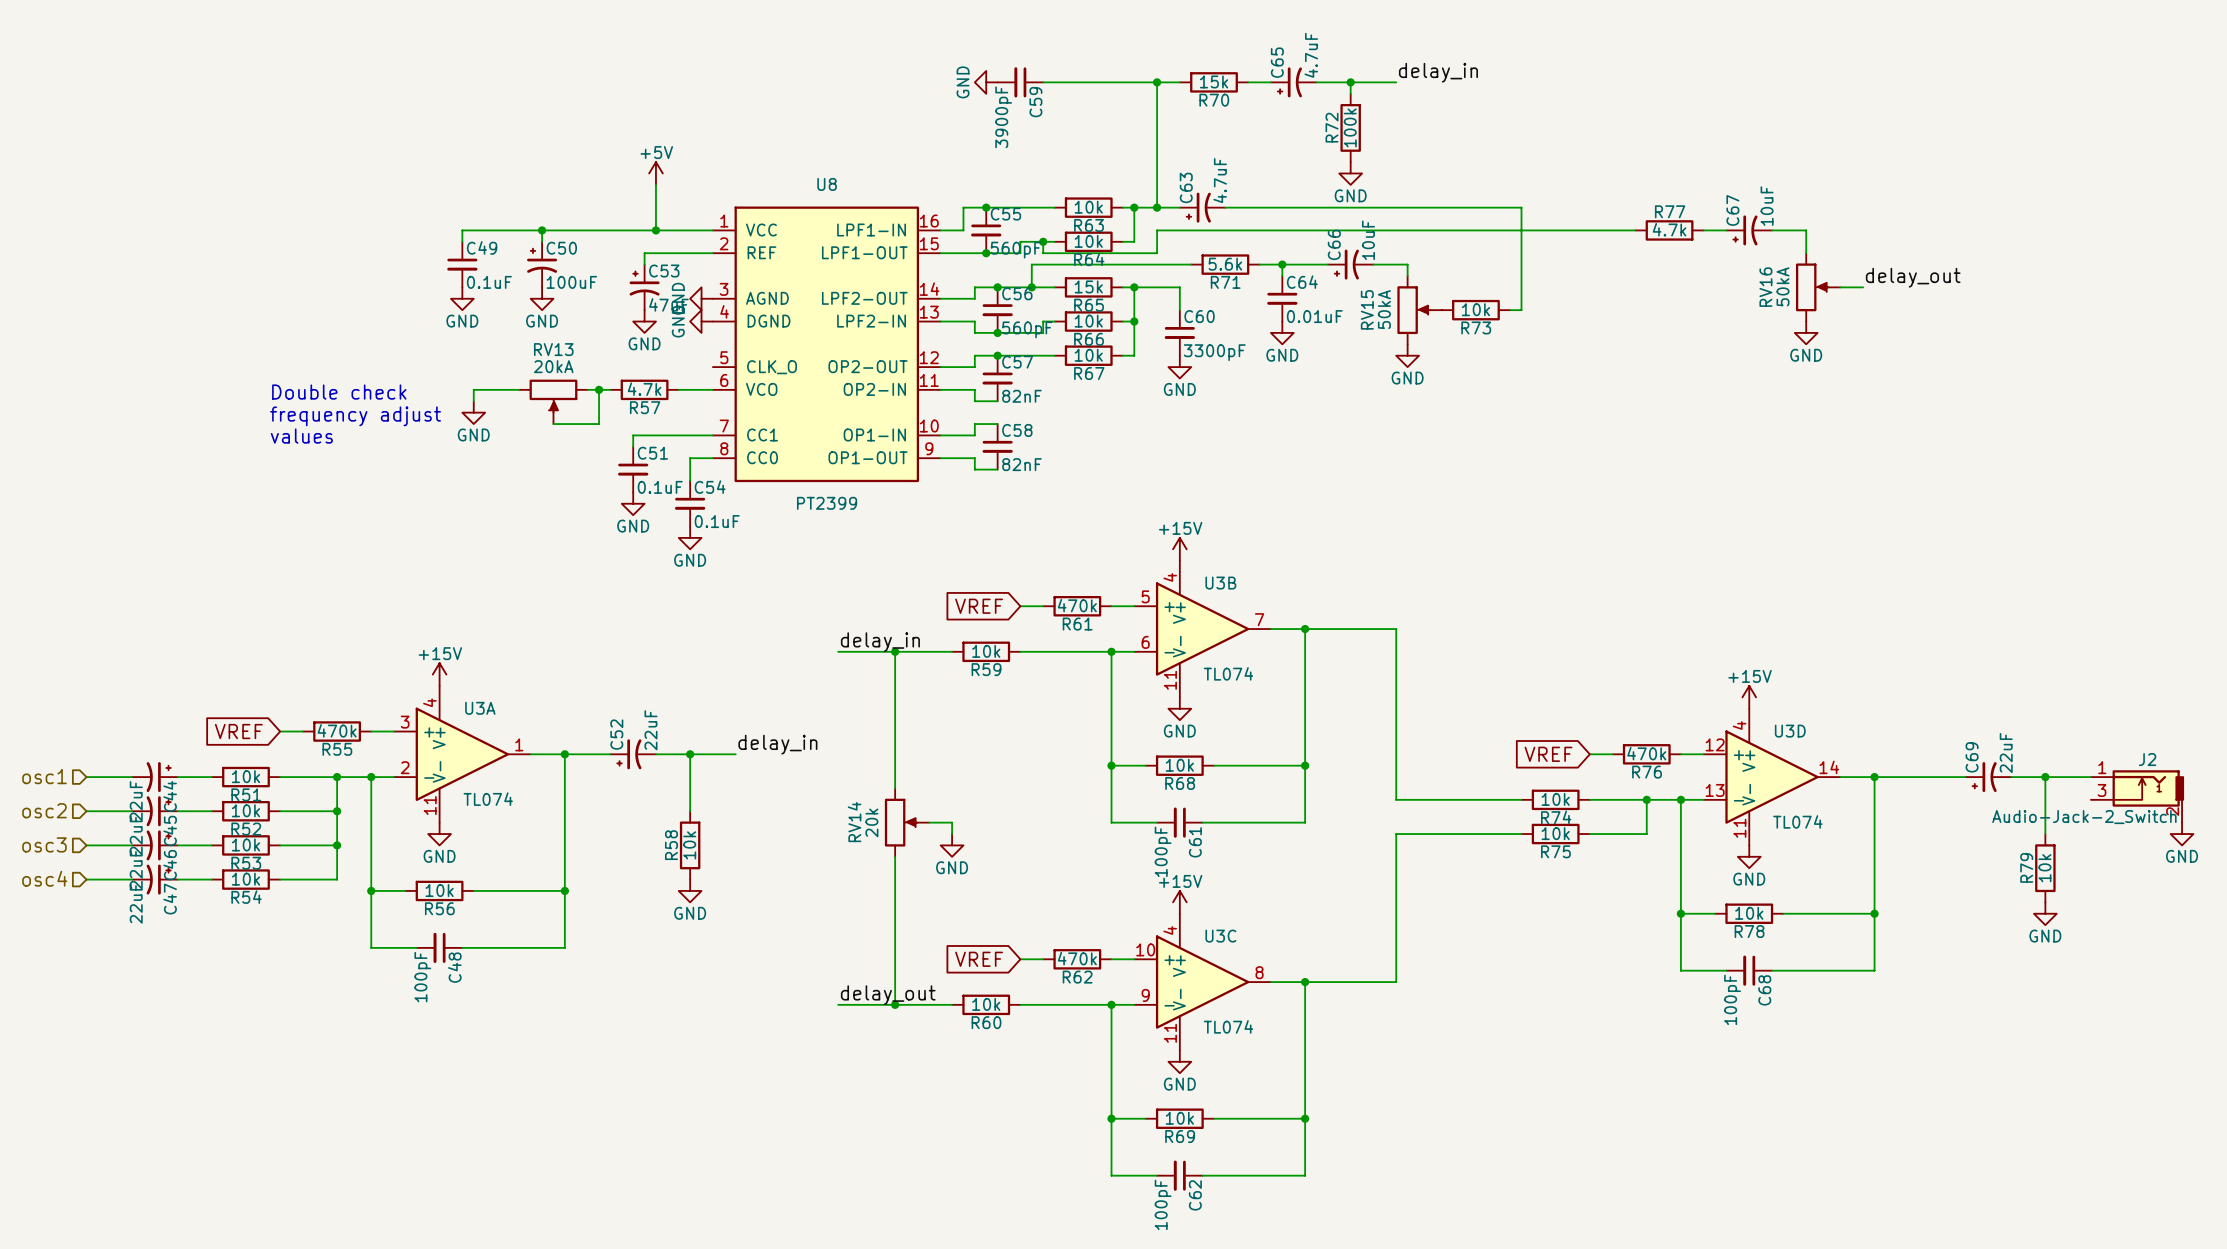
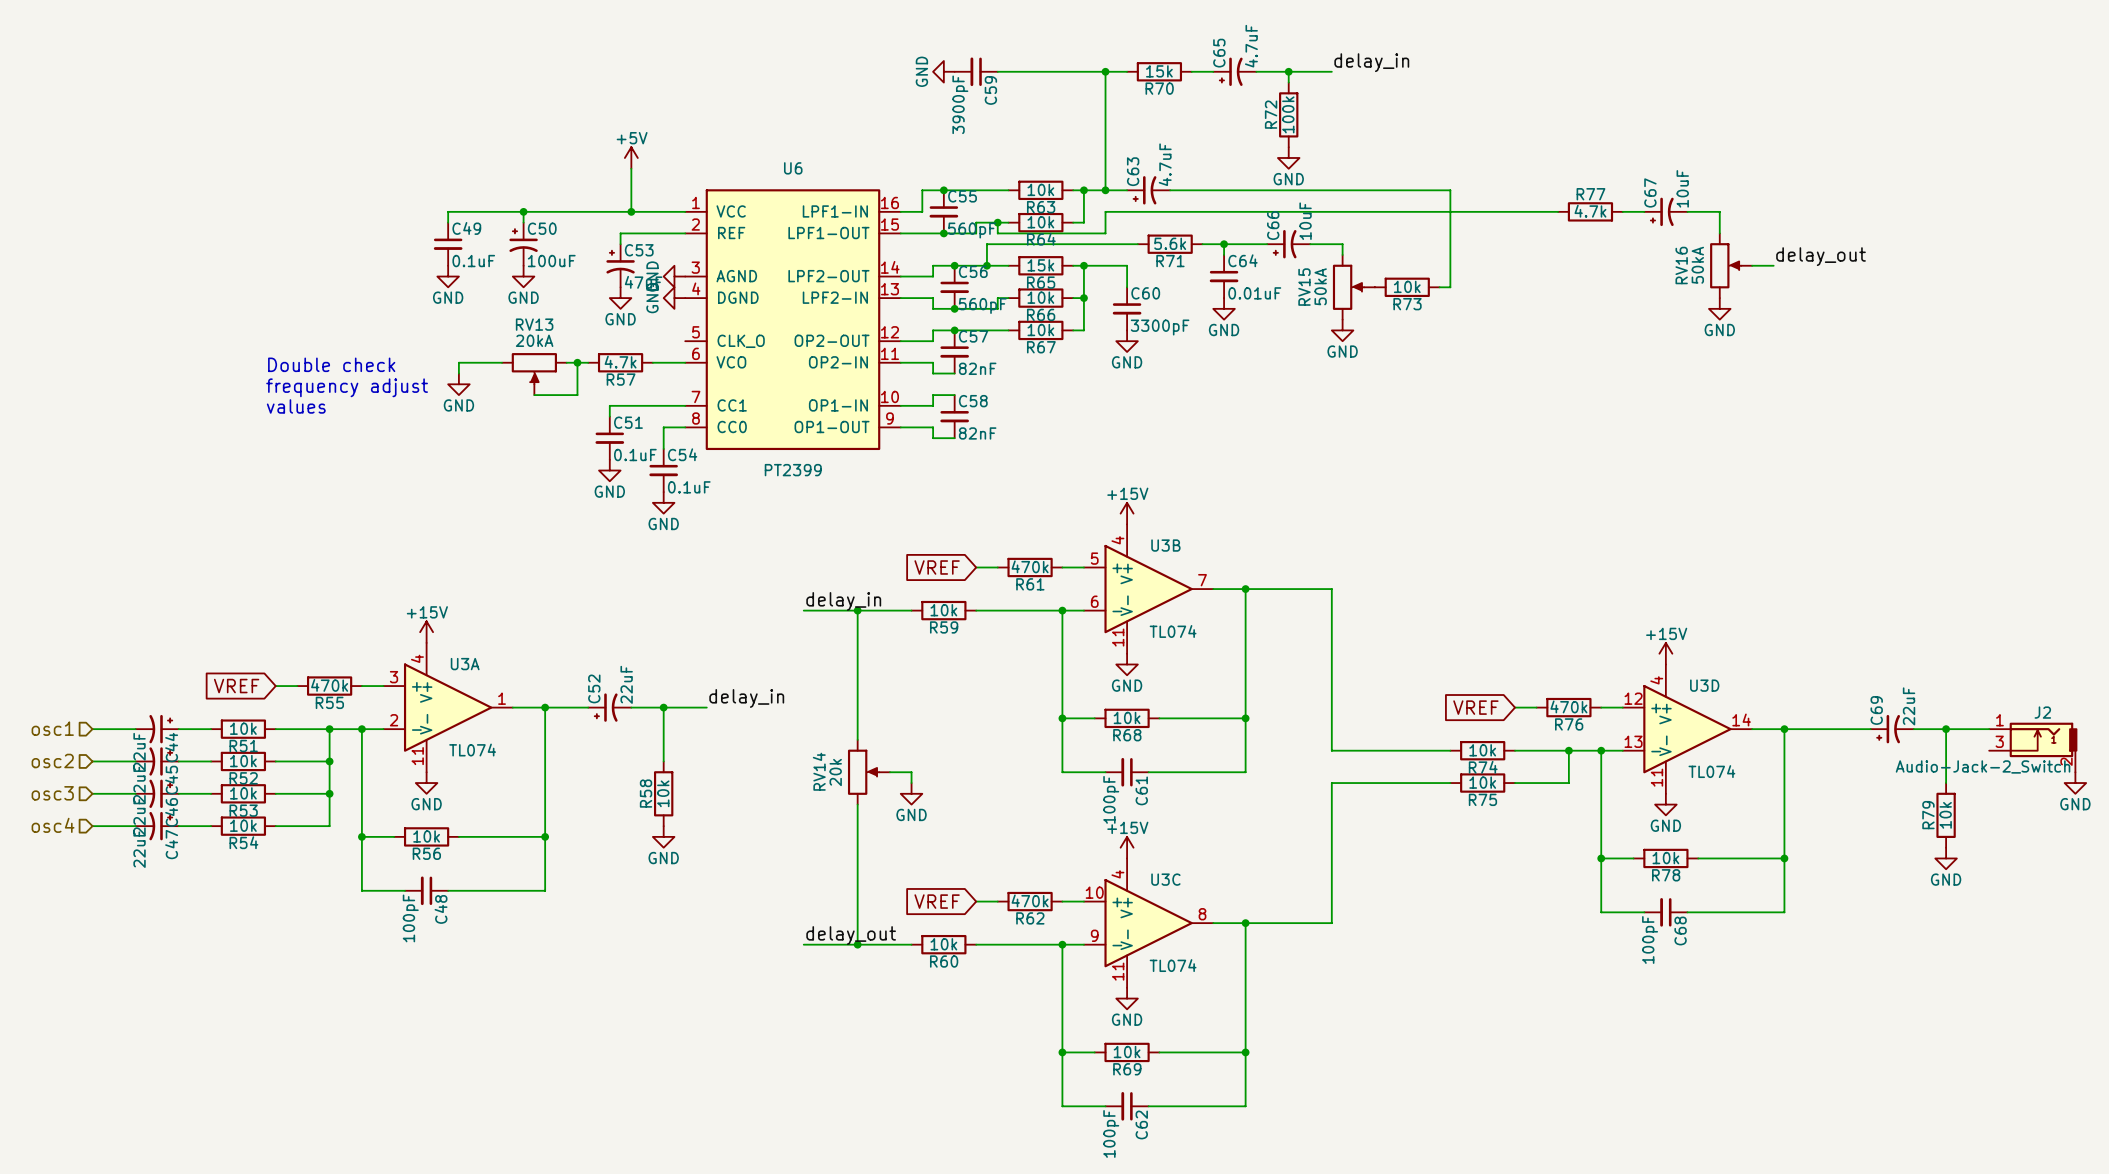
U8 name: U8 (827, 184) -> U6 (793, 168)

